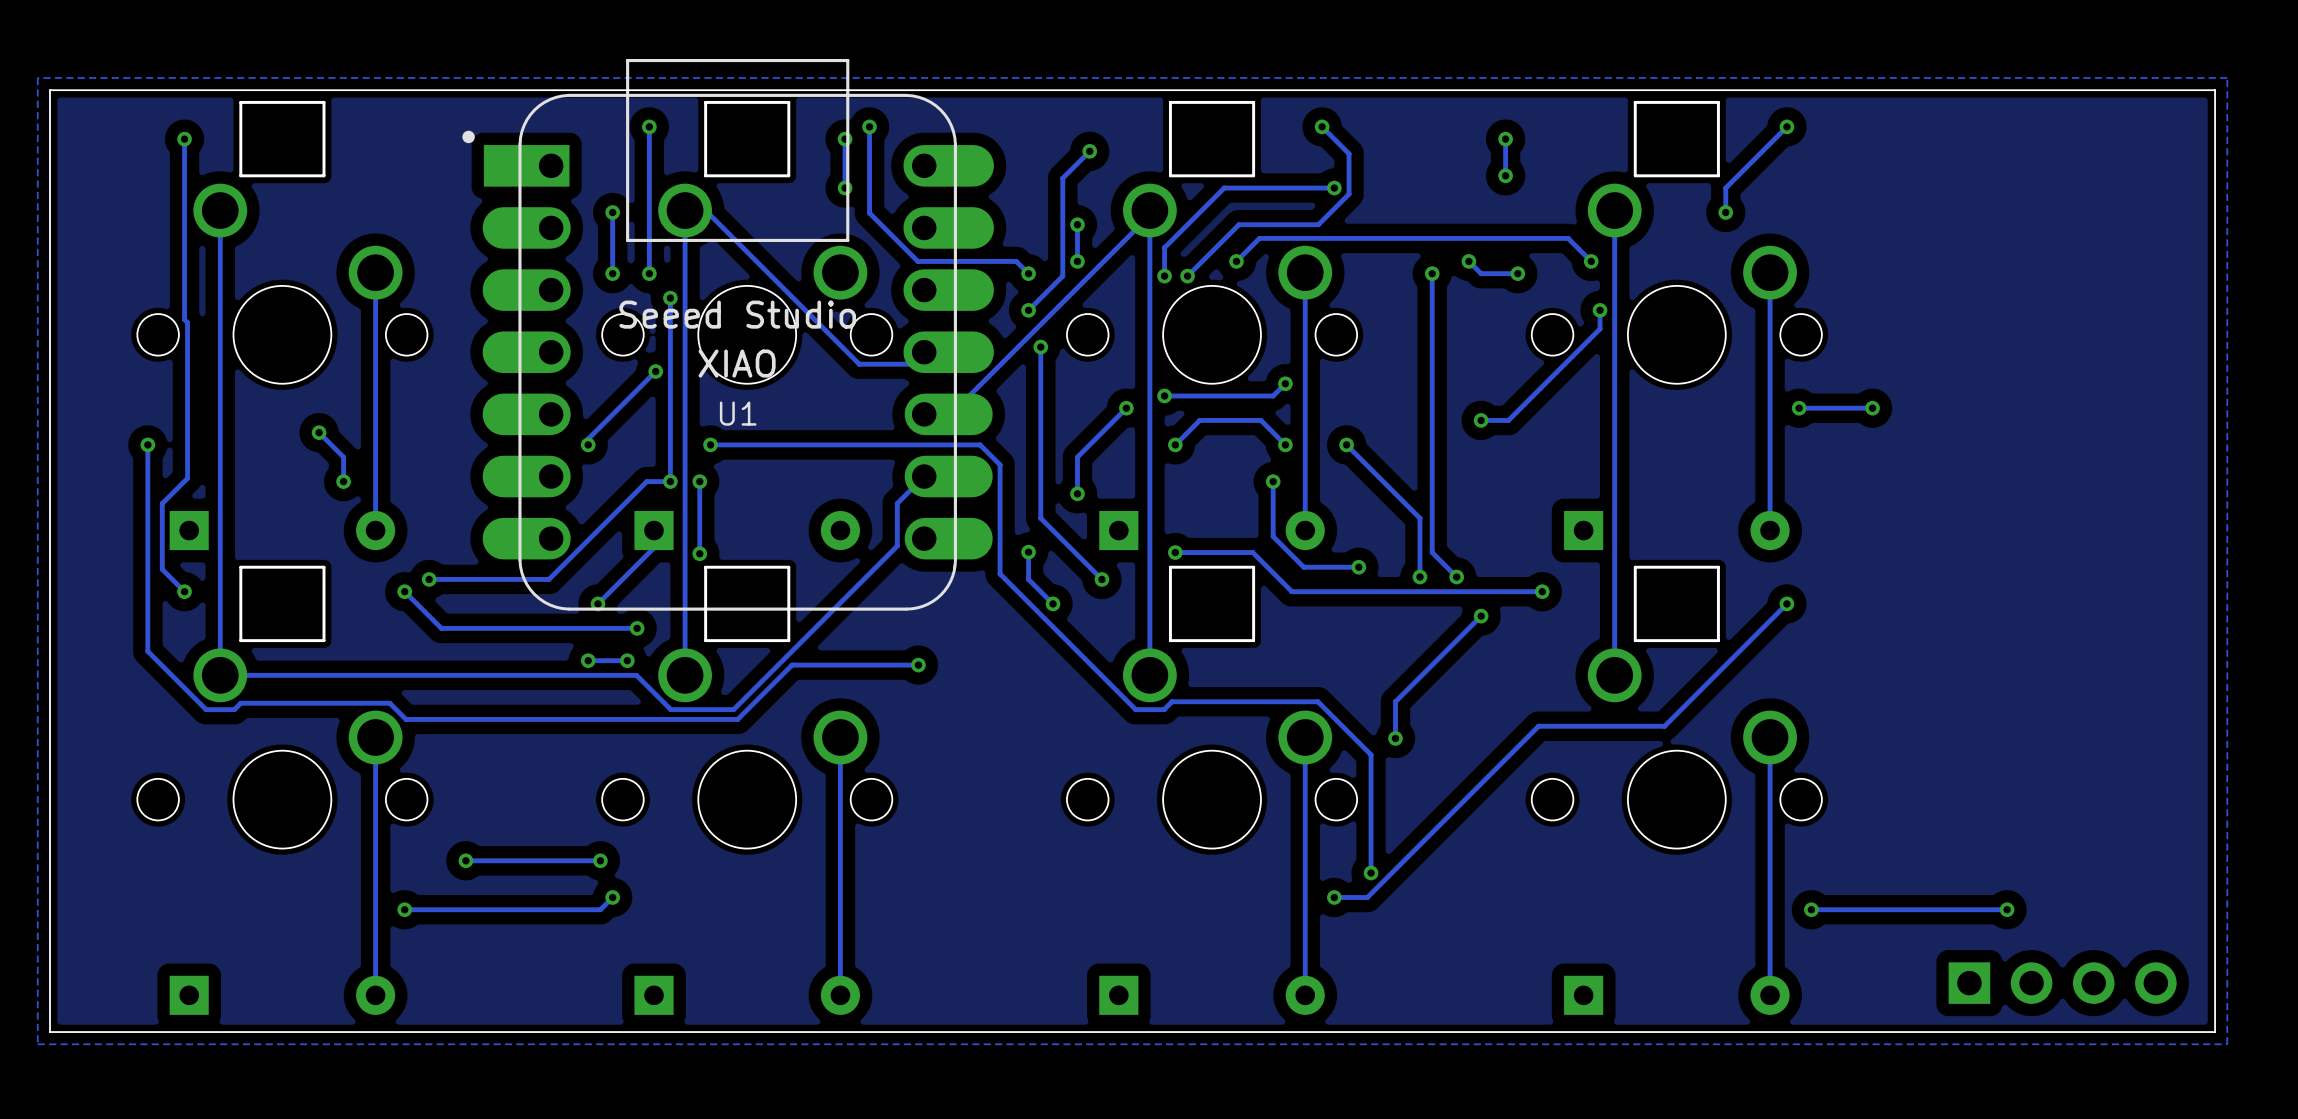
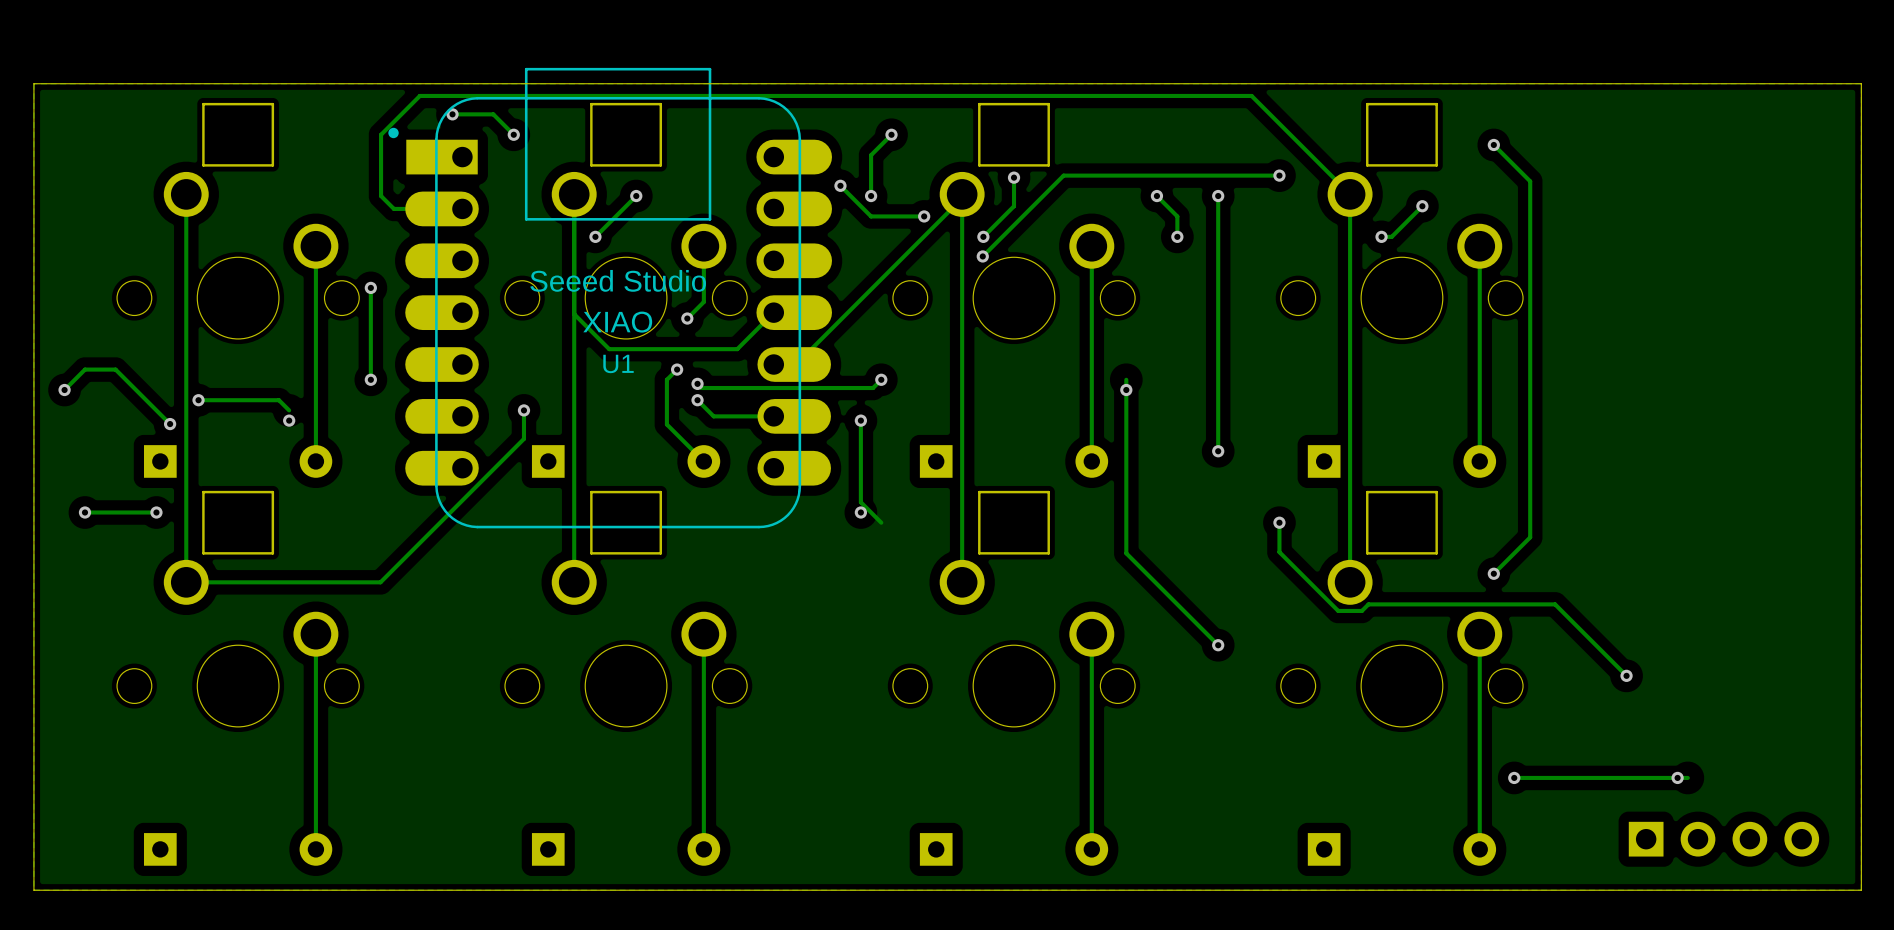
board edge: (2215, 90) (50, 90) (50, 1032) (2215, 1032) (2215, 90) -> (1861, 83) (1861, 890) (33, 890) (33, 83) (1861, 83)
track: none -> (452, 114) (493, 114) (513, 134)
via: none -> (452, 114)
track: (649, 126) (649, 273) -> none
via: (649, 126) -> none
track: (869, 126) (869, 213) (917, 261) (1016, 261) (1028, 273) -> none
via: (869, 126) -> none
track: (1322, 126) (1349, 153) (1349, 194) (1318, 224) (1238, 224) (1187, 276) -> none
via: (1322, 126) -> none
track: (1786, 126) (1725, 188) (1725, 212) -> none
via position: (1786, 126) -> (1493, 144)
track: (184, 139) (184, 319) (187, 322) (187, 478) (162, 503) (162, 569) (184, 591) -> (84, 512) (156, 512)
via: (184, 139) -> none
via: none -> (513, 134)
track: (845, 139) (845, 188) -> none
via: (845, 139) -> none
track: none -> (891, 134) (871, 155) (871, 196)
track: (1505, 139) (1505, 175) -> none
via: (1505, 139) -> none
track: (1089, 151) (1062, 178) (1062, 276) (1028, 310) -> none
via position: (1089, 151) -> (891, 134)
track: none -> (1493, 144) (1530, 181) (1530, 537) (1493, 573)
via: (1505, 175) -> none
via: (845, 188) -> none
track: (1271, 188) (1224, 188) (1164, 247) (1164, 276) -> (1063, 175) (982, 256)
via: (1334, 188) -> none
track: none -> (1279, 175) (1116, 175)
via: none -> (1279, 175)
track: none -> (1014, 177) (1014, 206) (983, 236)
via: none -> (1014, 177)
track: none -> (840, 185) (871, 216) (924, 216)
via: none -> (840, 185)
track: (685, 210) (705, 210) (859, 364) (912, 364) -> (574, 314) (609, 349) (737, 349) (763, 322)
track: none -> (1350, 194) (1251, 95) (419, 95) (381, 134) (381, 196) (393, 208) (462, 208)
track: (612, 212) (612, 273) -> none
via: (612, 212) -> none
track: none -> (636, 196) (595, 236)
via: none -> (636, 196)
via: none -> (871, 196)
track: none -> (1156, 196) (1177, 216) (1177, 236)
via: none -> (1156, 196)
track: none -> (1218, 196) (1218, 451)
via: none -> (1218, 196)
via position: (1725, 212) -> (1422, 206)
track: (1077, 224) (1077, 261) -> none
via: (1077, 224) -> none
track: none -> (1422, 206) (1391, 236) (1381, 236)
via: none -> (924, 216)
via: none -> (595, 236)
via: (1077, 261) -> none
via: none -> (983, 236)
via: (1236, 261) -> none
track: (1468, 261) (1481, 273) (1517, 273) -> none
via: (1468, 261) -> none
track: (1591, 261) (1568, 238) (1259, 238) (1236, 261) -> none
via: (1591, 261) -> none
via: none -> (1381, 236)
track: none -> (703, 246) (703, 301) (687, 318)
via: (612, 273) -> none
via: (649, 273) -> none
via: (1028, 273) -> none
track: (1432, 273) (1432, 552) (1456, 577) -> none
via position: (1432, 273) -> (1177, 236)
via: (1517, 273) -> none
via: (1164, 276) -> none
via: (1187, 276) -> none
via: none -> (982, 256)
track: (670, 298) (670, 481) (646, 481) (624, 503) -> (523, 410) (523, 438)
via: (670, 298) -> none
via: (1028, 310) -> none
track: (1600, 310) (1600, 328) (1508, 420) (1481, 420) -> none
via: (1600, 310) -> none
track: none -> (370, 287) (370, 379)
via: none -> (370, 287)
track: (1040, 347) (1040, 518) (1101, 579) -> none
via: (1040, 347) -> none
via: none -> (687, 318)
track: (655, 371) (588, 439) (588, 444) -> none
via: (655, 371) -> none
track: (1285, 383) (1273, 395) (1164, 395) -> none
via: (1285, 383) -> none
via: (1164, 395) -> none
track: (1126, 408) (1077, 457) (1077, 493) -> none
via: (1126, 408) -> none
via: (1799, 408) -> none
track: (1872, 408) (1799, 408) -> none
via: (1872, 408) -> none
track: none -> (677, 369) (666, 379) (666, 424) (703, 461)
via: none -> (677, 369)
via: (1481, 420) -> none
track: (319, 432) (343, 457) (343, 481) -> none
via: (319, 432) -> none
via: none -> (370, 379)
track: none -> (881, 379) (873, 388) (701, 388) (697, 383)
via: none -> (881, 379)
track: none -> (1126, 379) (1126, 553) (1218, 645)
via: none -> (697, 383)
track: none -> (64, 390) (84, 369) (115, 369) (170, 424)
via: none -> (64, 390)
track: (147, 444) (147, 651) (206, 709) (234, 709) (240, 703) (389, 703) (406, 719) (737, 719) (792, 665) (918, 665) -> none
via: (147, 444) -> none
via: (588, 444) -> none
track: (710, 444) (980, 444) (1000, 464) (1000, 574) (1135, 709) (1164, 709) (1171, 701) (1317, 701) (1371, 754) (1371, 873) -> none
via: (710, 444) -> none
via: (1175, 444) -> none
track: (1285, 444) (1260, 420) (1199, 420) (1175, 444) -> none
via: (1285, 444) -> none
track: (1346, 444) (1419, 518) (1419, 577) -> none
track: none -> (198, 400) (278, 400) (289, 410)
via: none -> (198, 400)
via: none -> (697, 400)
via: none -> (523, 410)
track: (924, 476) (897, 503) (897, 546) (733, 709) (670, 709) (636, 675) (453, 675) -> (773, 416) (713, 416) (697, 400)
via: (670, 481) -> none
track: (699, 481) (699, 553) -> none
via: (699, 481) -> none
track: none -> (860, 420) (860, 479)
via: none -> (860, 420)
track: (1273, 481) (1273, 536) (1303, 567) (1358, 567) -> none
via: (1273, 481) -> none
via: none -> (170, 424)
via: (1077, 493) -> none
via: none -> (1218, 451)
track: (654, 530) (654, 547) (597, 603) -> none
via: (1028, 552) -> none
track: (1175, 552) (1252, 552) (1291, 591) (1542, 591) -> none
via: (1175, 552) -> none
via: (699, 553) -> none
via: (1358, 567) -> none
via: (1419, 577) -> none
via: (1456, 577) -> none
via: (429, 579) -> none
track: (548, 579) (429, 579) -> (460, 502) (380, 582)
via: (1101, 579) -> none
via: none -> (84, 512)
track: (404, 591) (441, 628) (637, 628) -> none
via: (404, 591) -> none
via: none -> (860, 512)
via position: (1542, 591) -> (1279, 522)
via: (597, 603) -> none
via: (1053, 603) -> none
track: none -> (1279, 522) (1279, 552) (1338, 610) (1361, 610) (1368, 604) (1555, 604) (1626, 675)
track: (1786, 603) (1664, 726) (1538, 726) (1367, 897) (1334, 897) -> none
via position: (1786, 603) -> (1493, 573)
track: (1481, 616) (1395, 701) (1395, 738) -> none
via: (1481, 616) -> none
via: (637, 628) -> none
via: (588, 660) -> none
track: (627, 660) (588, 660) -> none
via: (627, 660) -> none
via: (918, 665) -> none
via position: (1395, 738) -> (1218, 645)
via: none -> (1626, 675)
via: (465, 860) -> none
track: (600, 860) (465, 860) -> none
via: (600, 860) -> none
via: (1371, 873) -> none
track: (612, 897) (600, 909) (404, 909) -> none
via: (612, 897) -> none
via: (1334, 897) -> none
via: (404, 909) -> none
track: none -> (1687, 777) (1677, 777)

